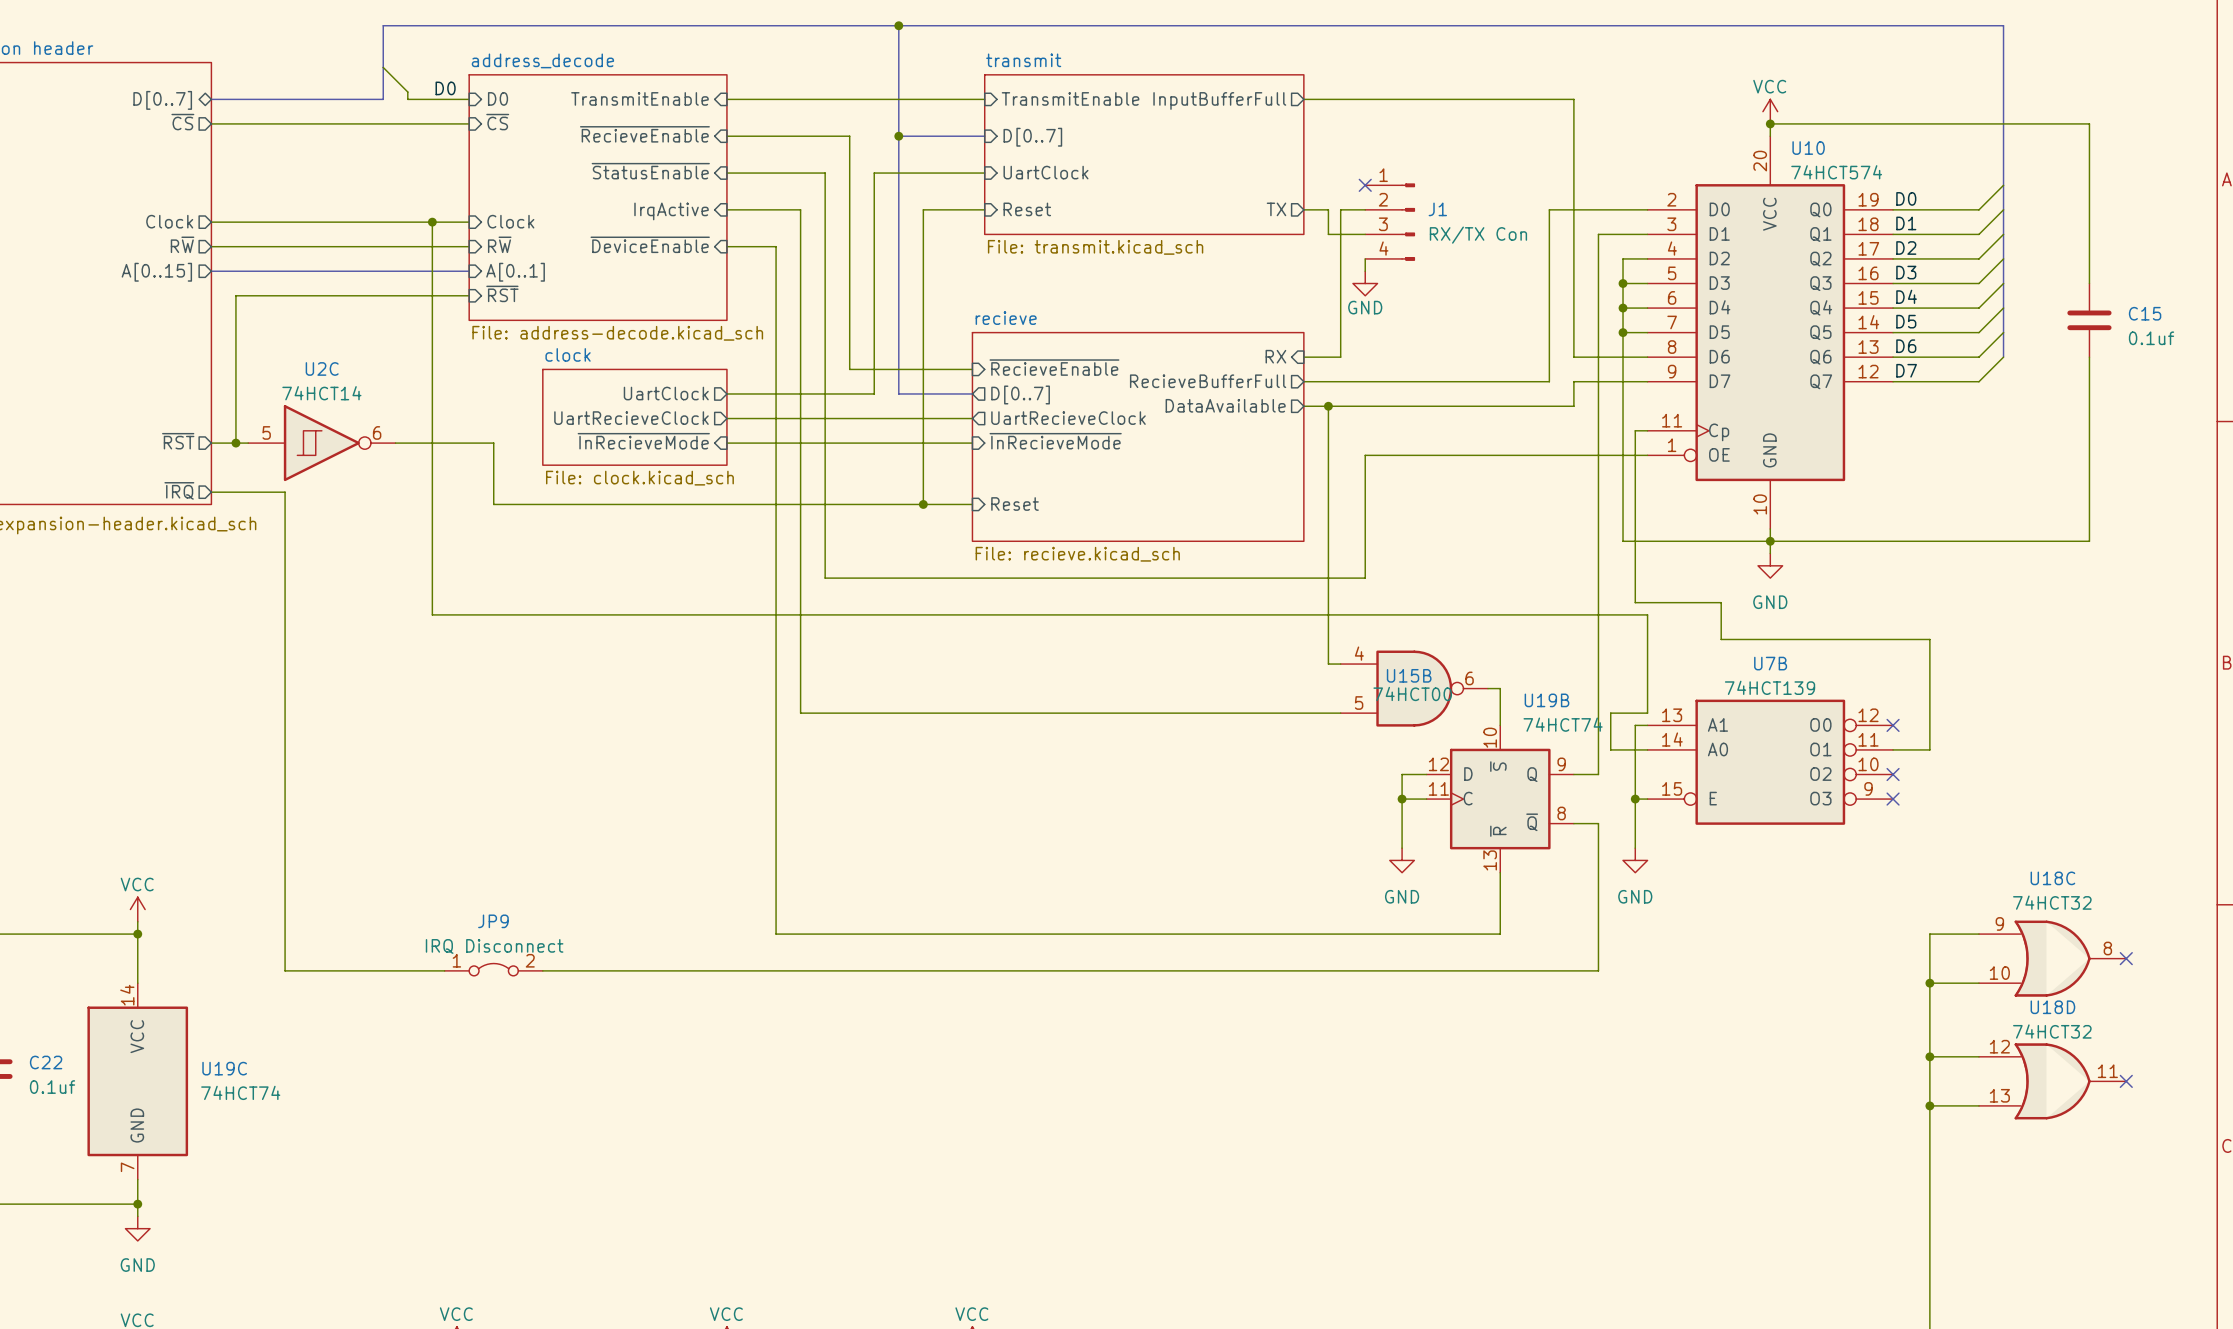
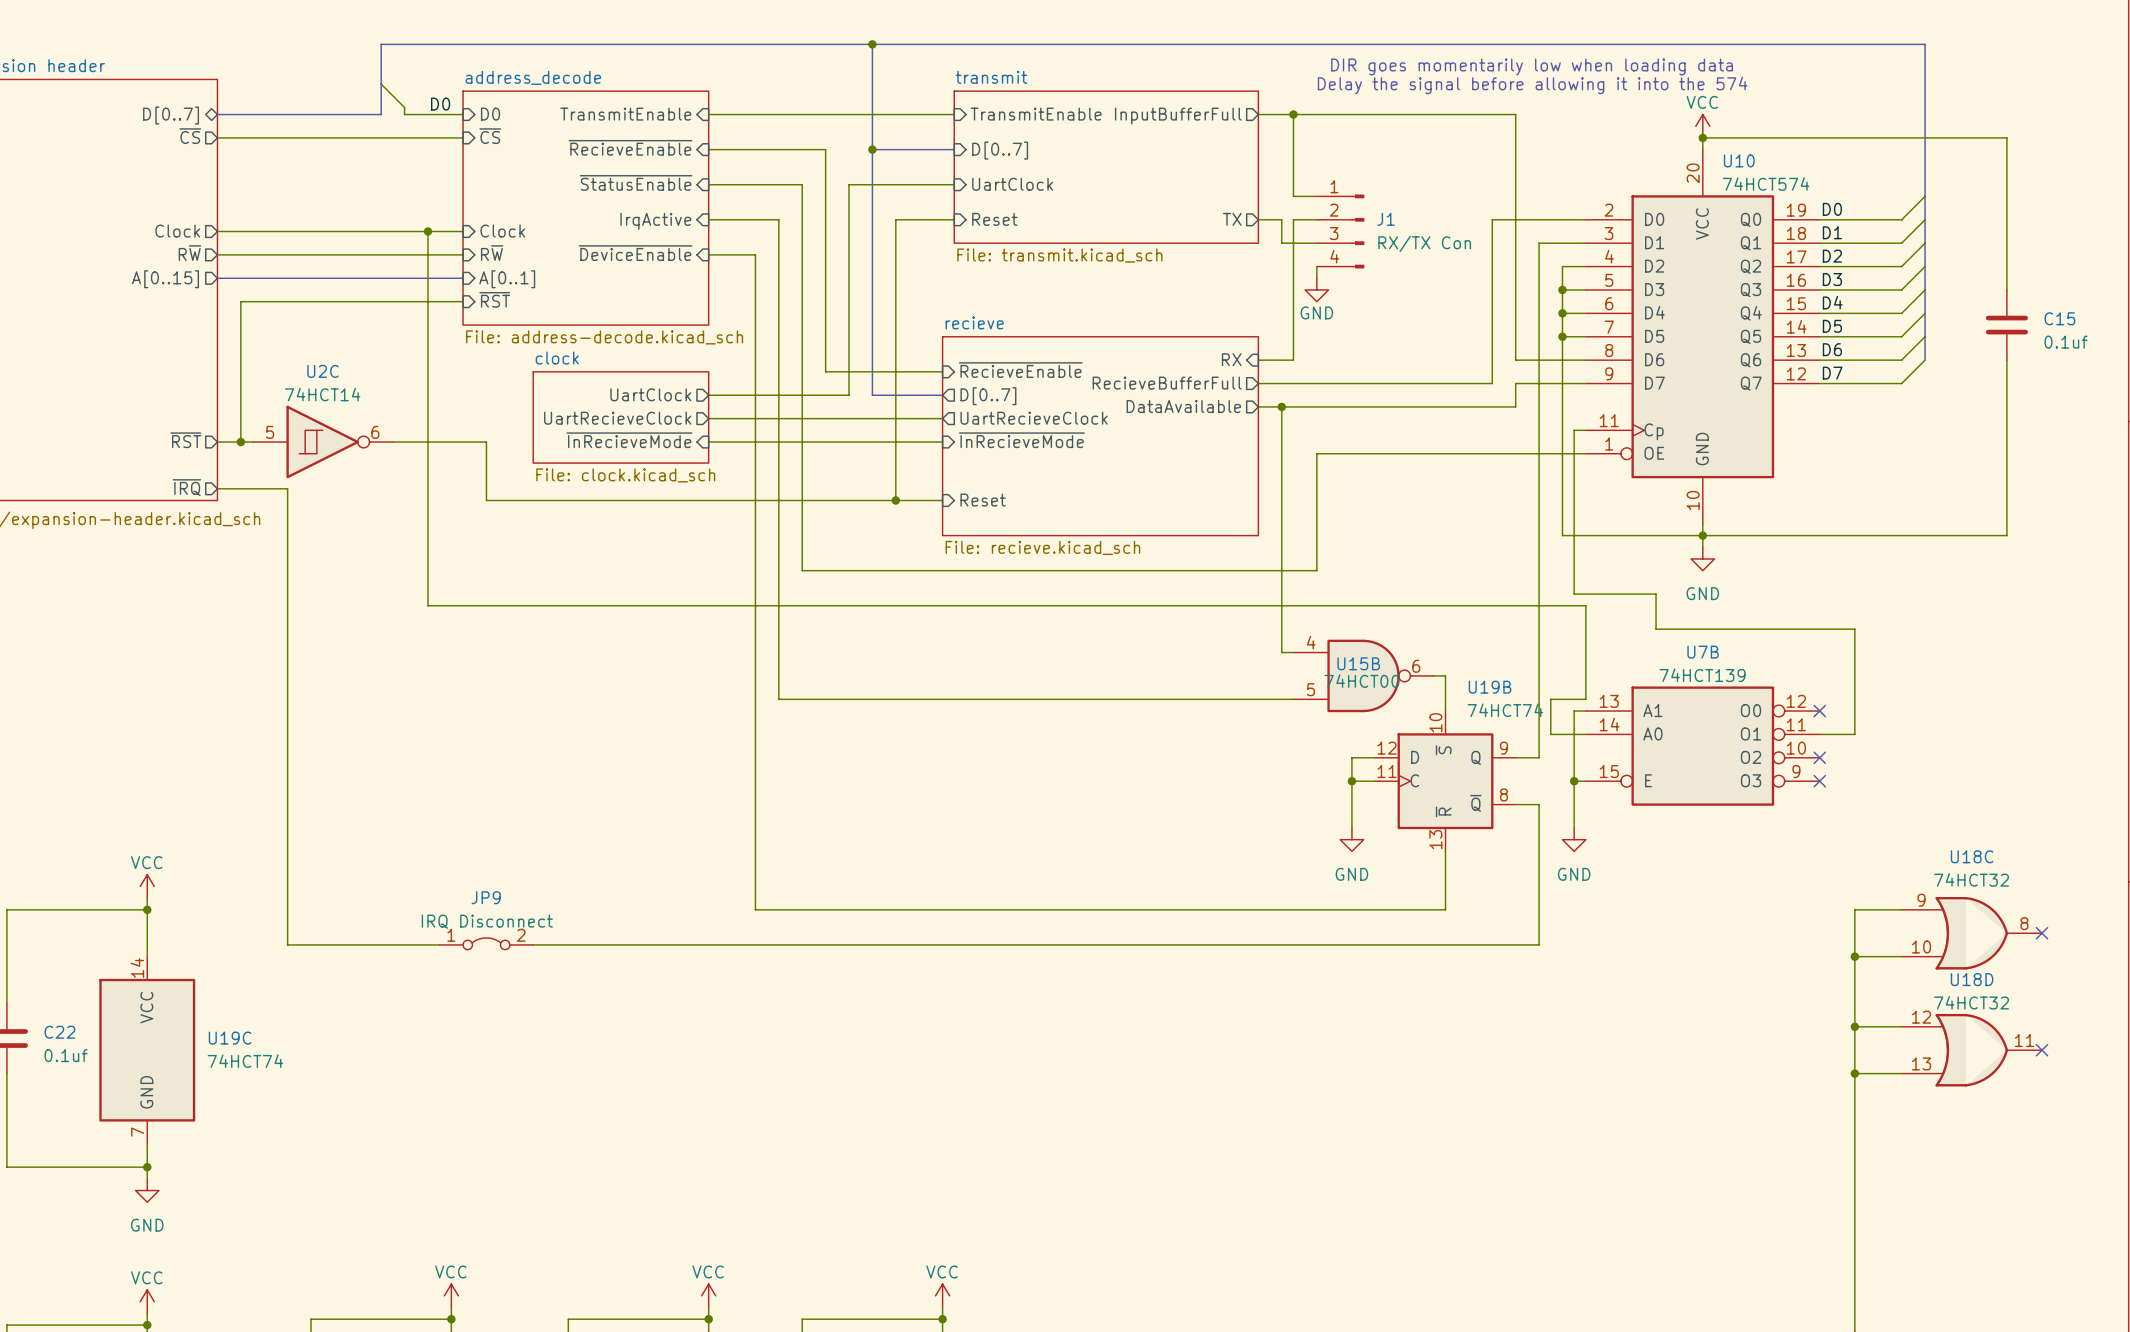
text: none -> DIR goes momentarily low when loading data (1532, 66)
text: none -> Delay the signal before allowing it into the 574 (1532, 85)
wire: none -> (1293, 114) (1293, 196) (1316, 196)
junction: none -> (1293, 114)
no-connect mark: (1365, 185) -> none

